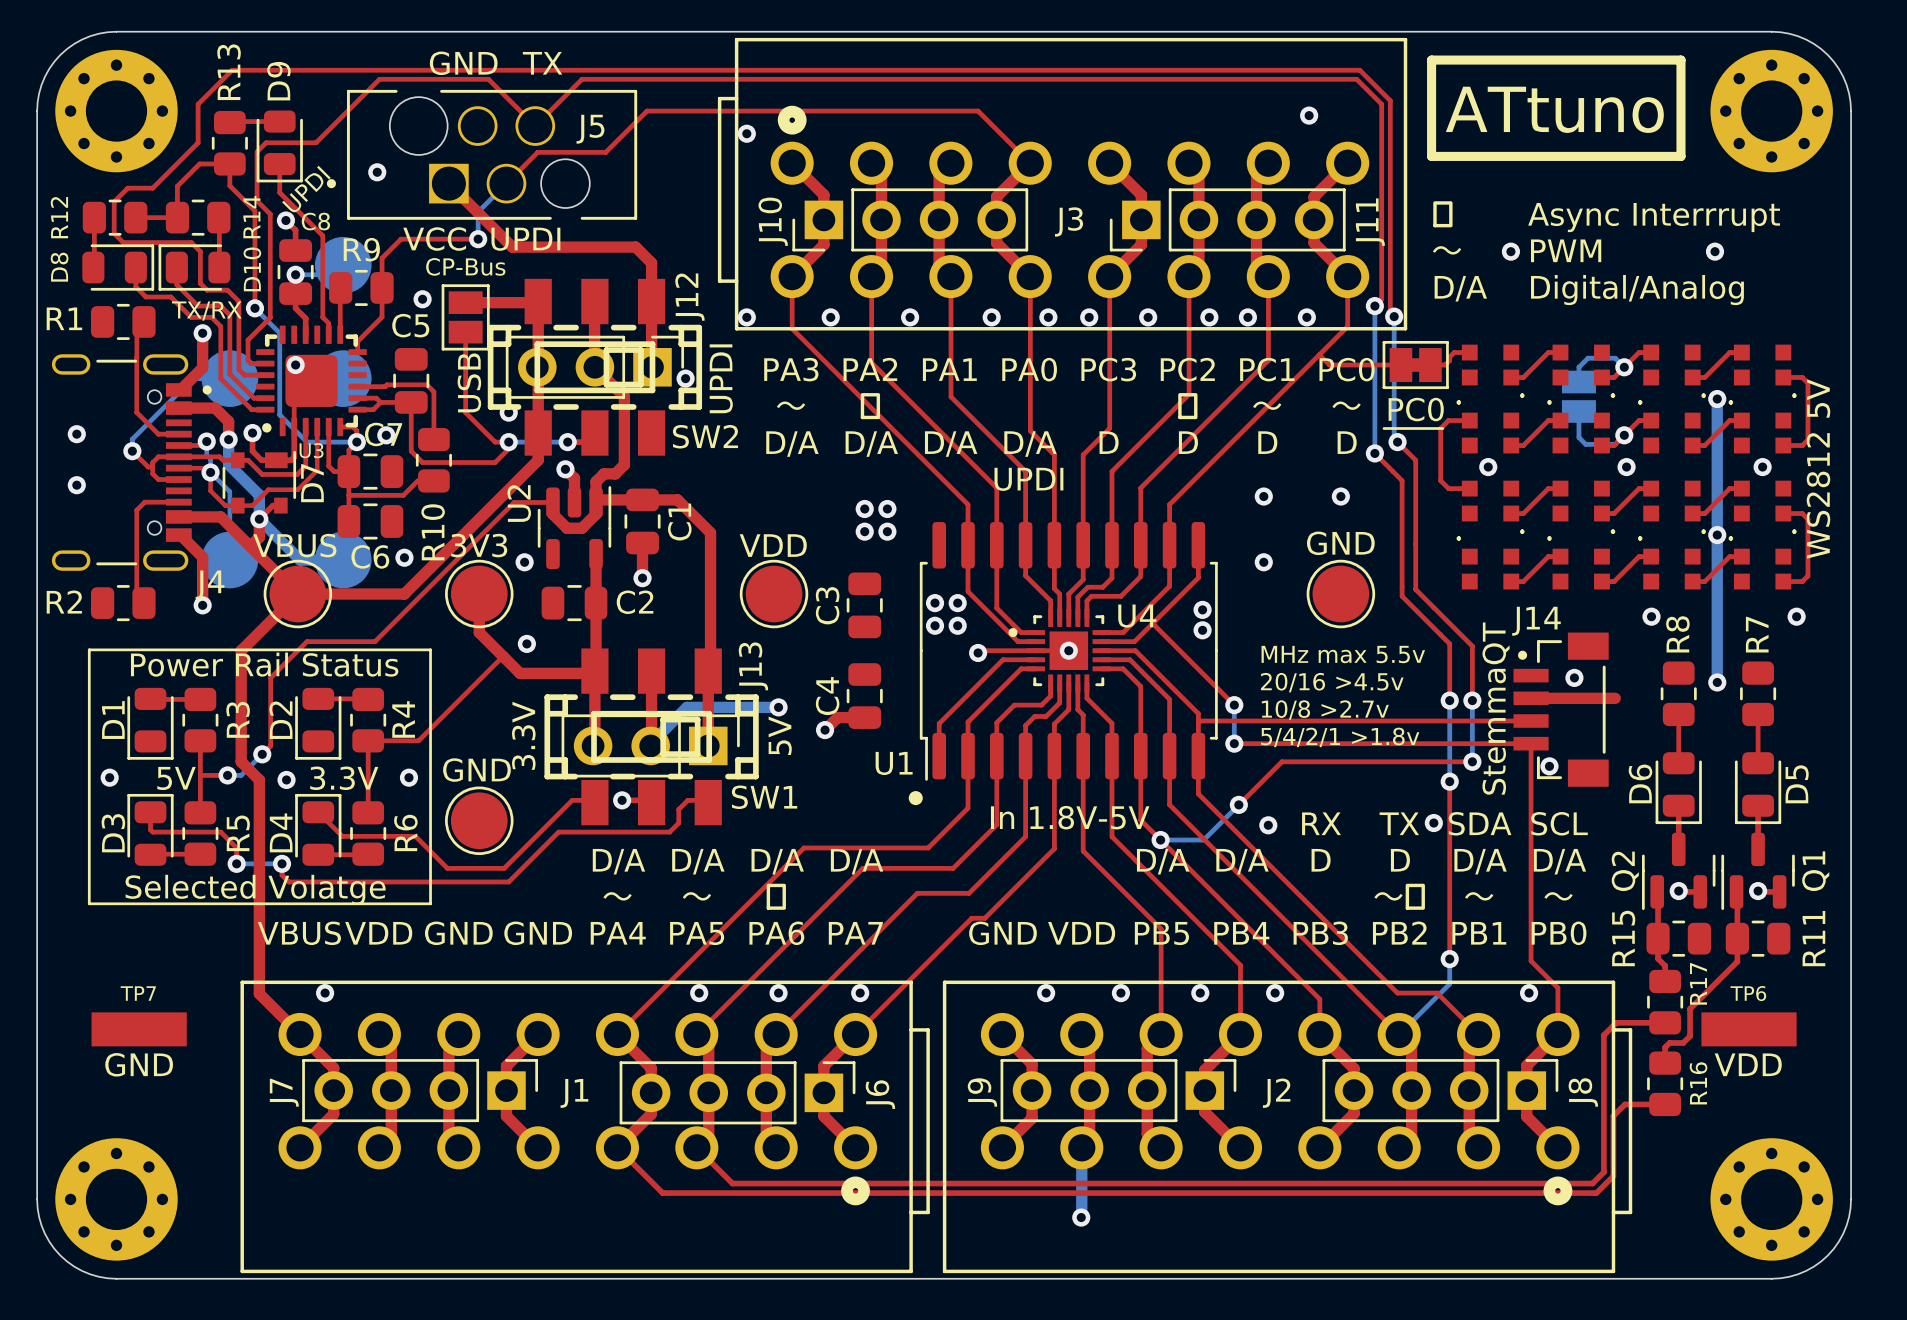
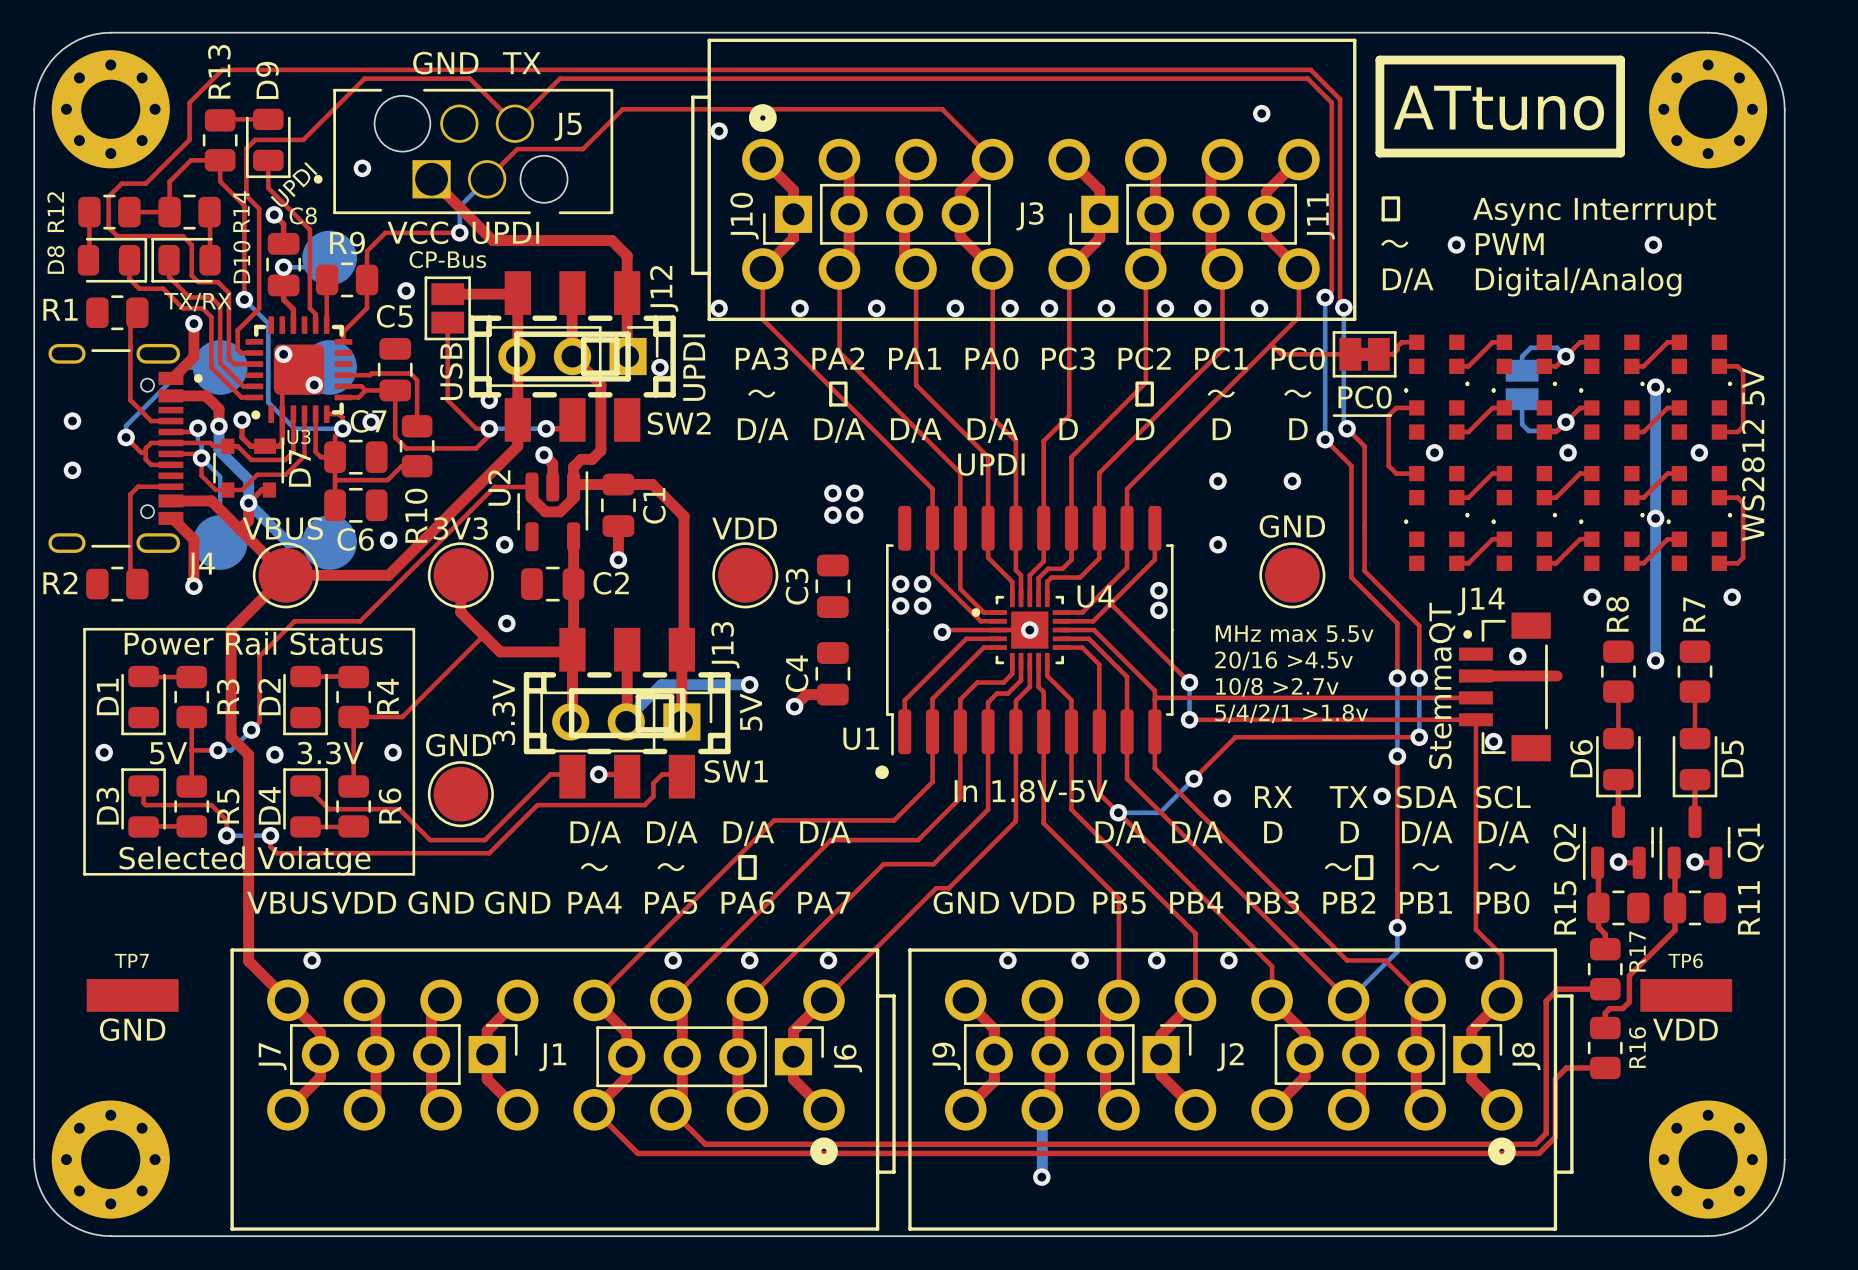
via: none -> (314, 384)

